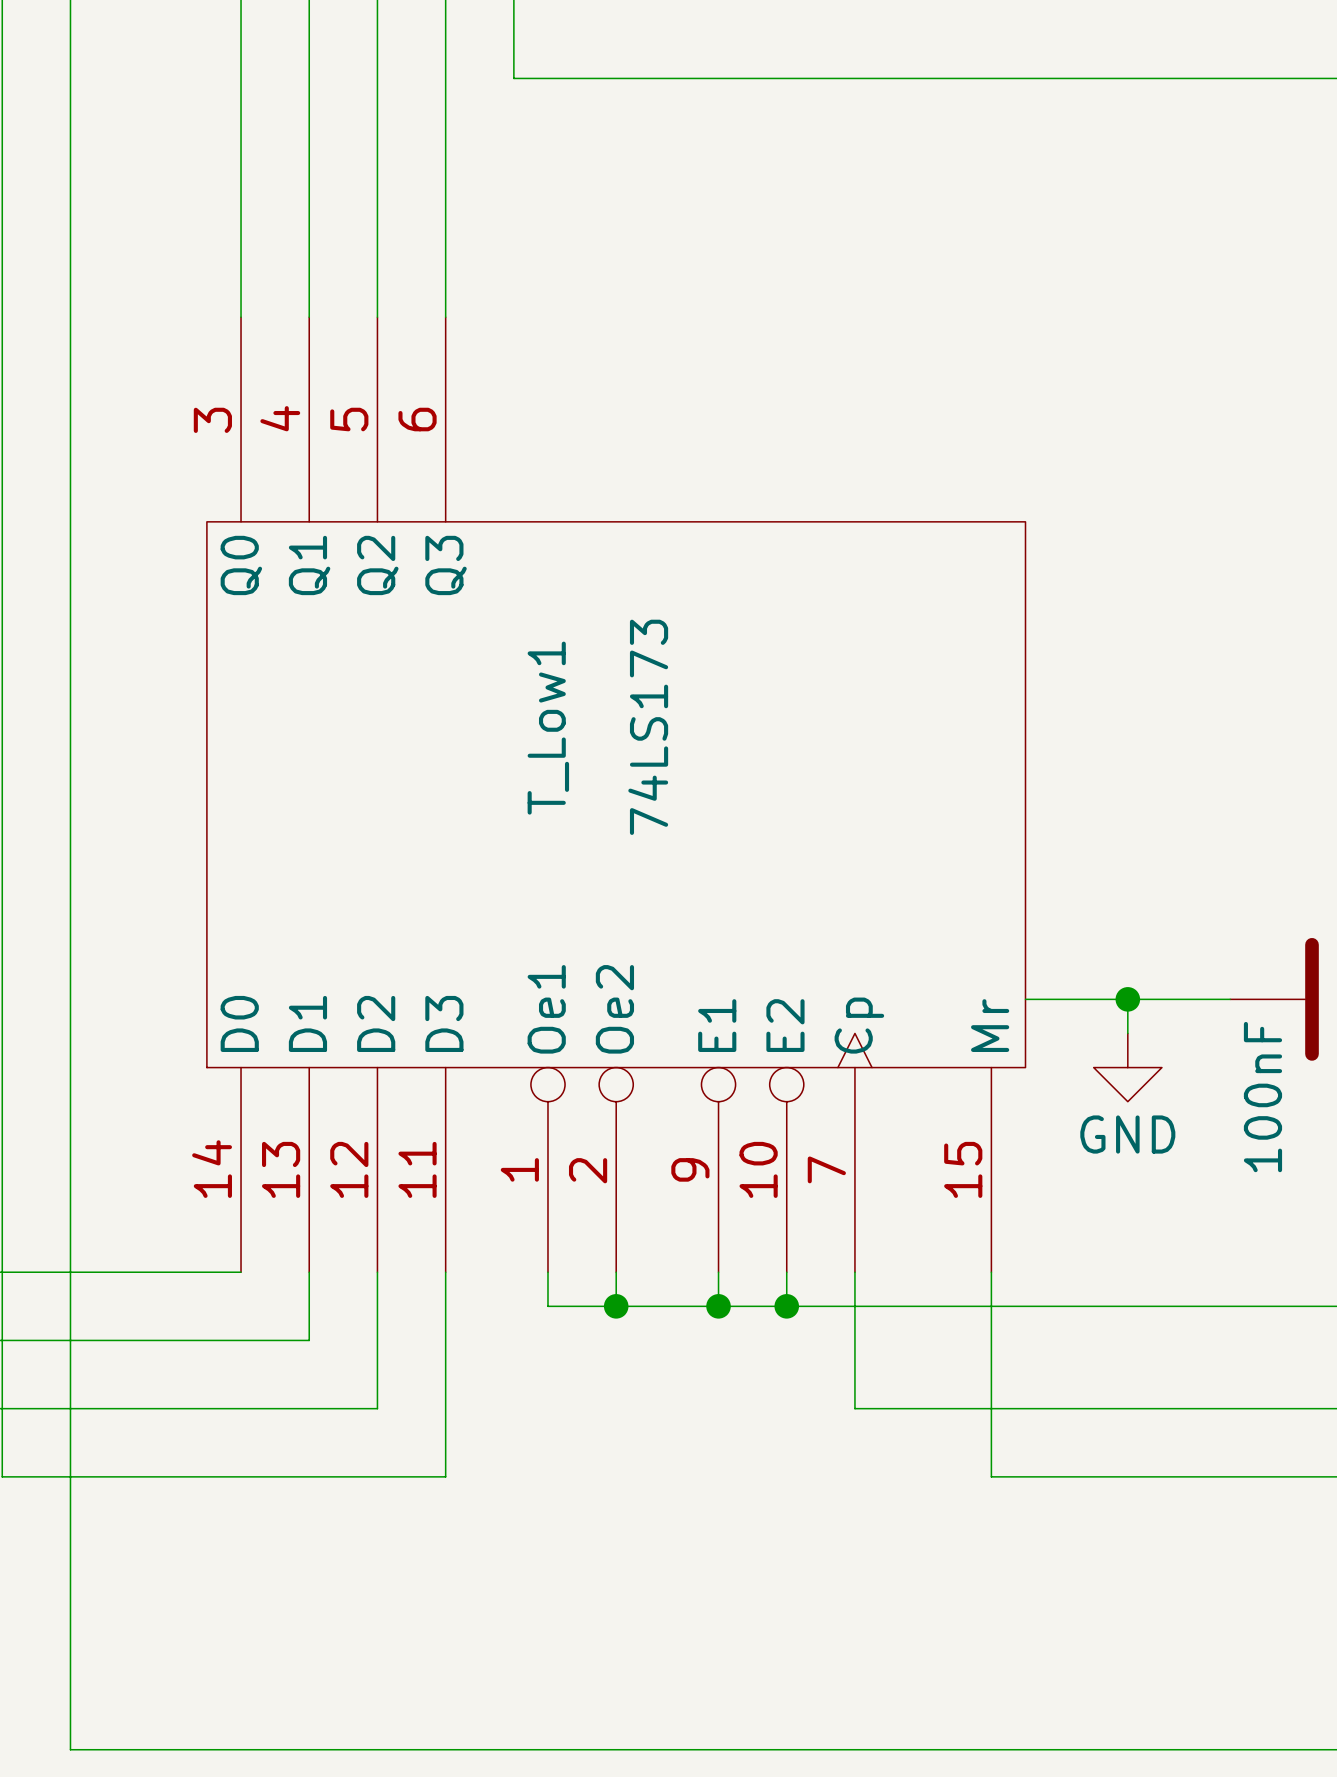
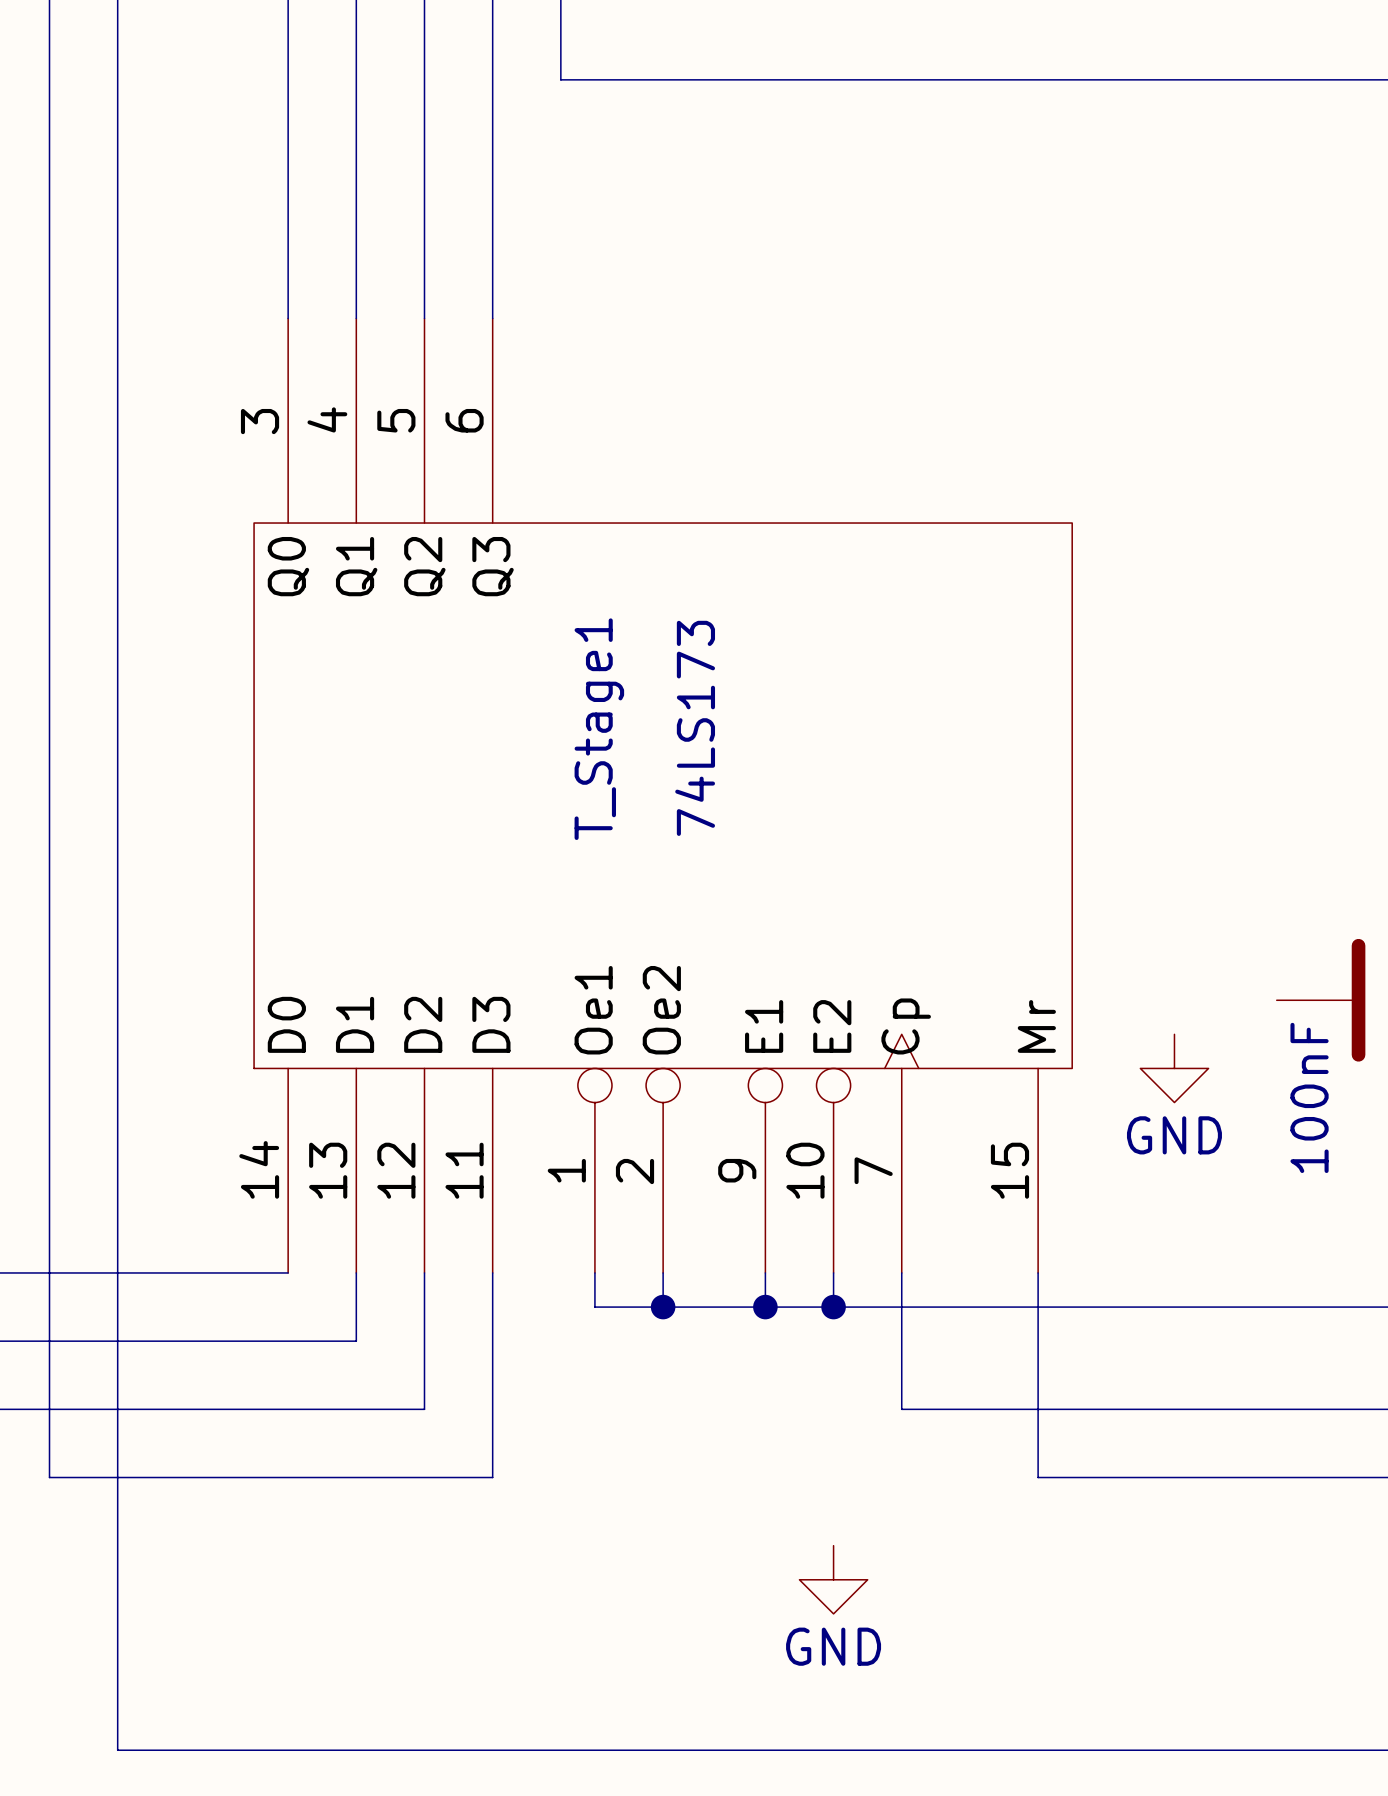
T_Low1 name: T_Low1 (548, 728) -> T_Stage1 (599, 729)
wire: (1025, 999) (1230, 999) -> none
wire: (1127, 999) (1127, 1033) -> none
junction: (1127, 999) -> none
power symbol: none -> GND (833, 1579)

